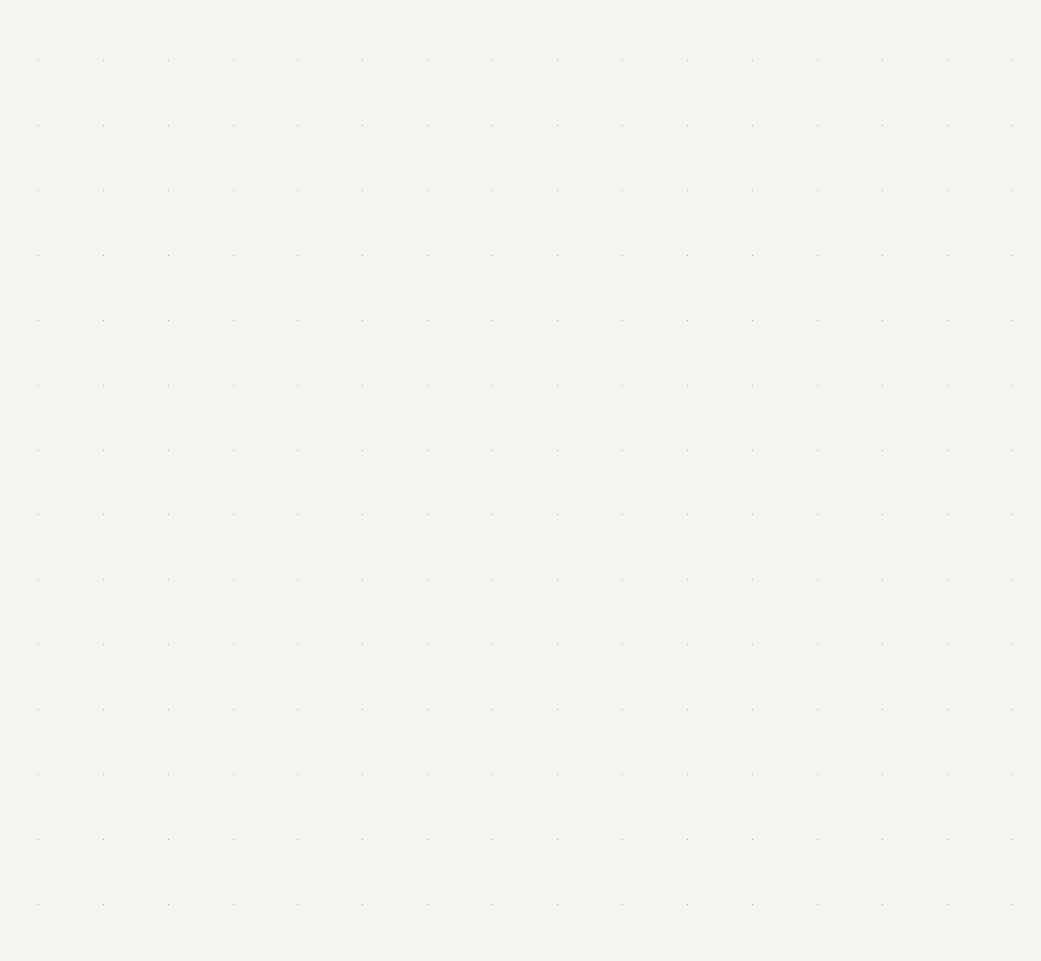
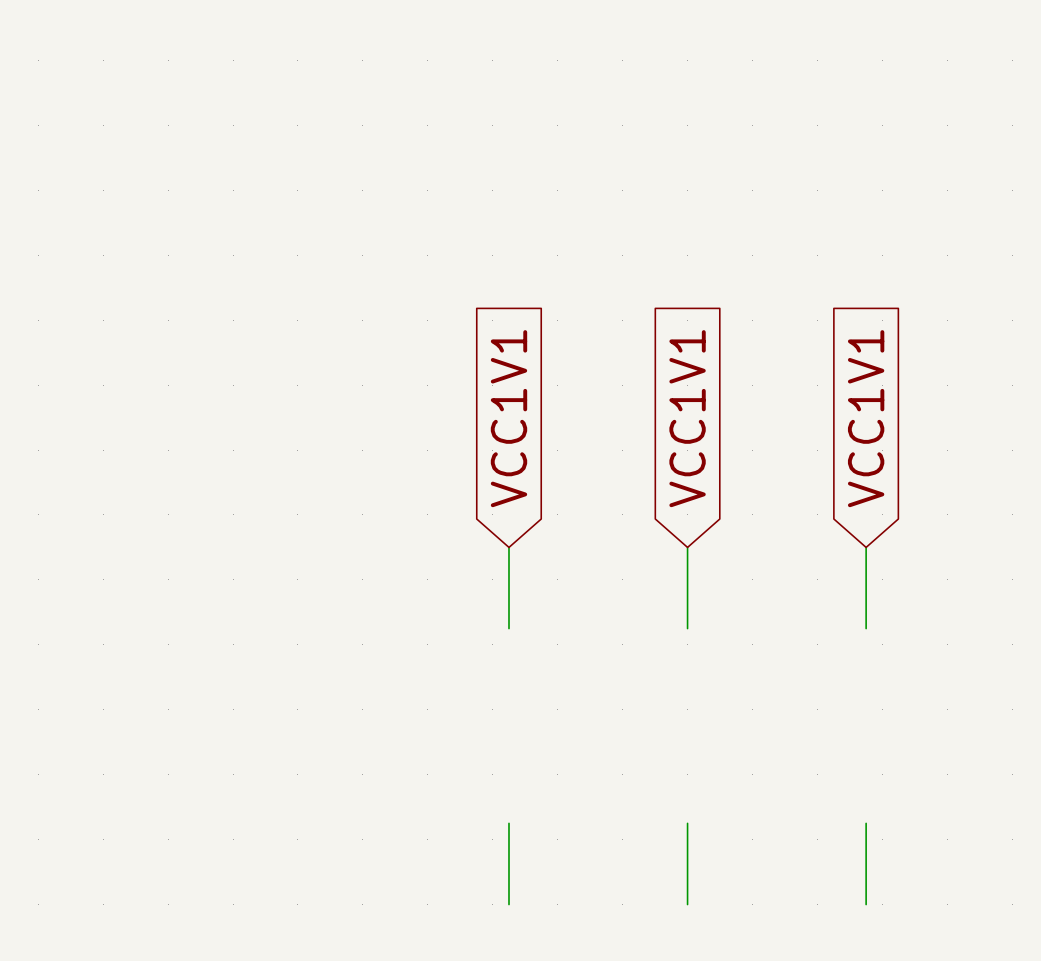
global label: none -> VCC1V1 (508, 418)
global label: none -> VCC1V1 (687, 418)
global label: none -> VCC1V1 (866, 418)
wire: none -> (508, 547) (508, 628)
wire: none -> (687, 547) (687, 628)
wire: none -> (866, 547) (866, 628)
wire: none -> (508, 823) (508, 904)
wire: none -> (687, 823) (687, 904)
wire: none -> (866, 823) (866, 904)

